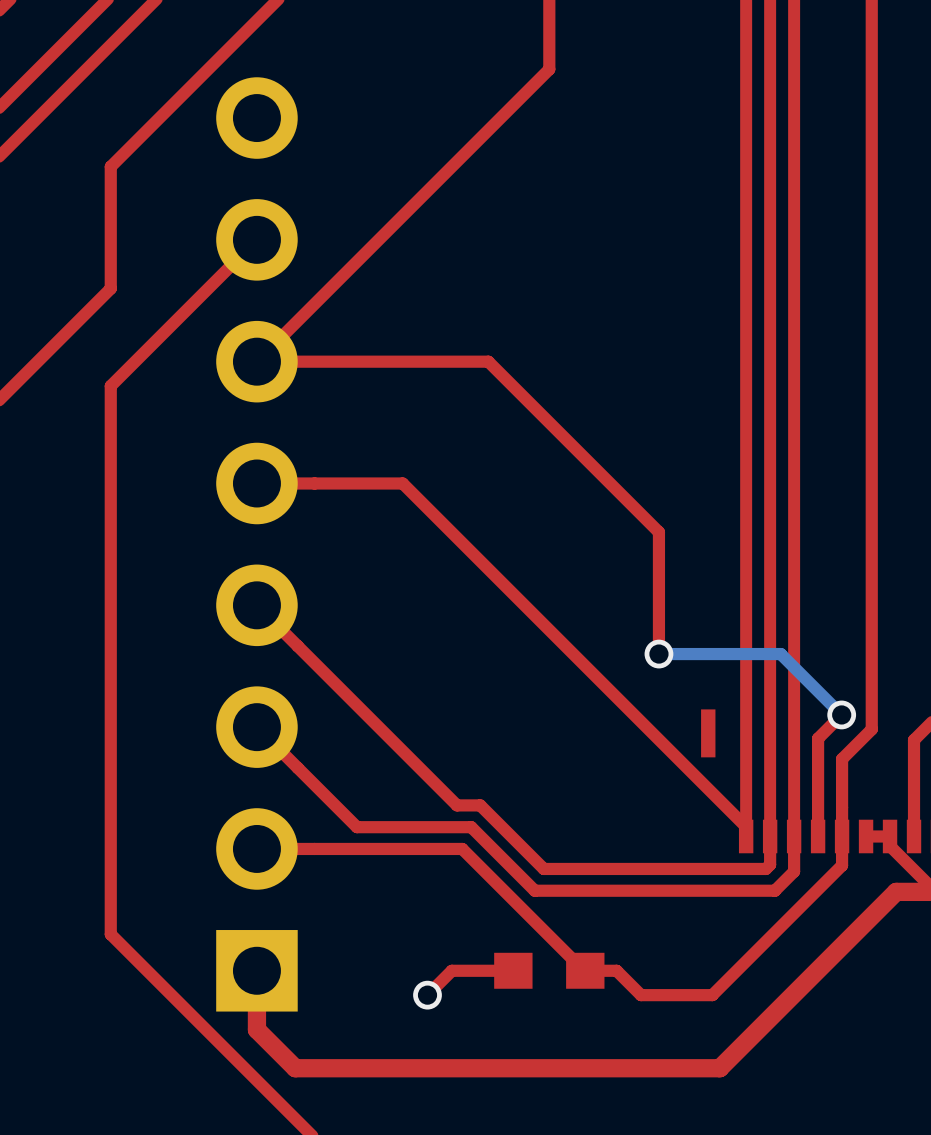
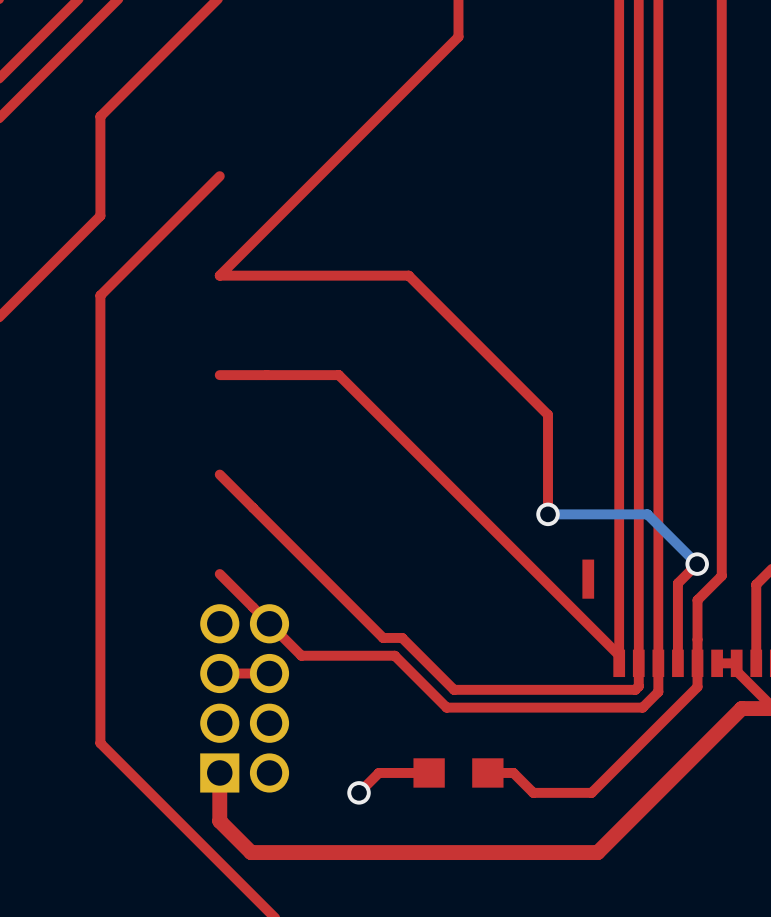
part: (256, 544) -> none
top track: (314, 848) (462, 848) (584, 970) -> none
part: none -> (244, 698)

